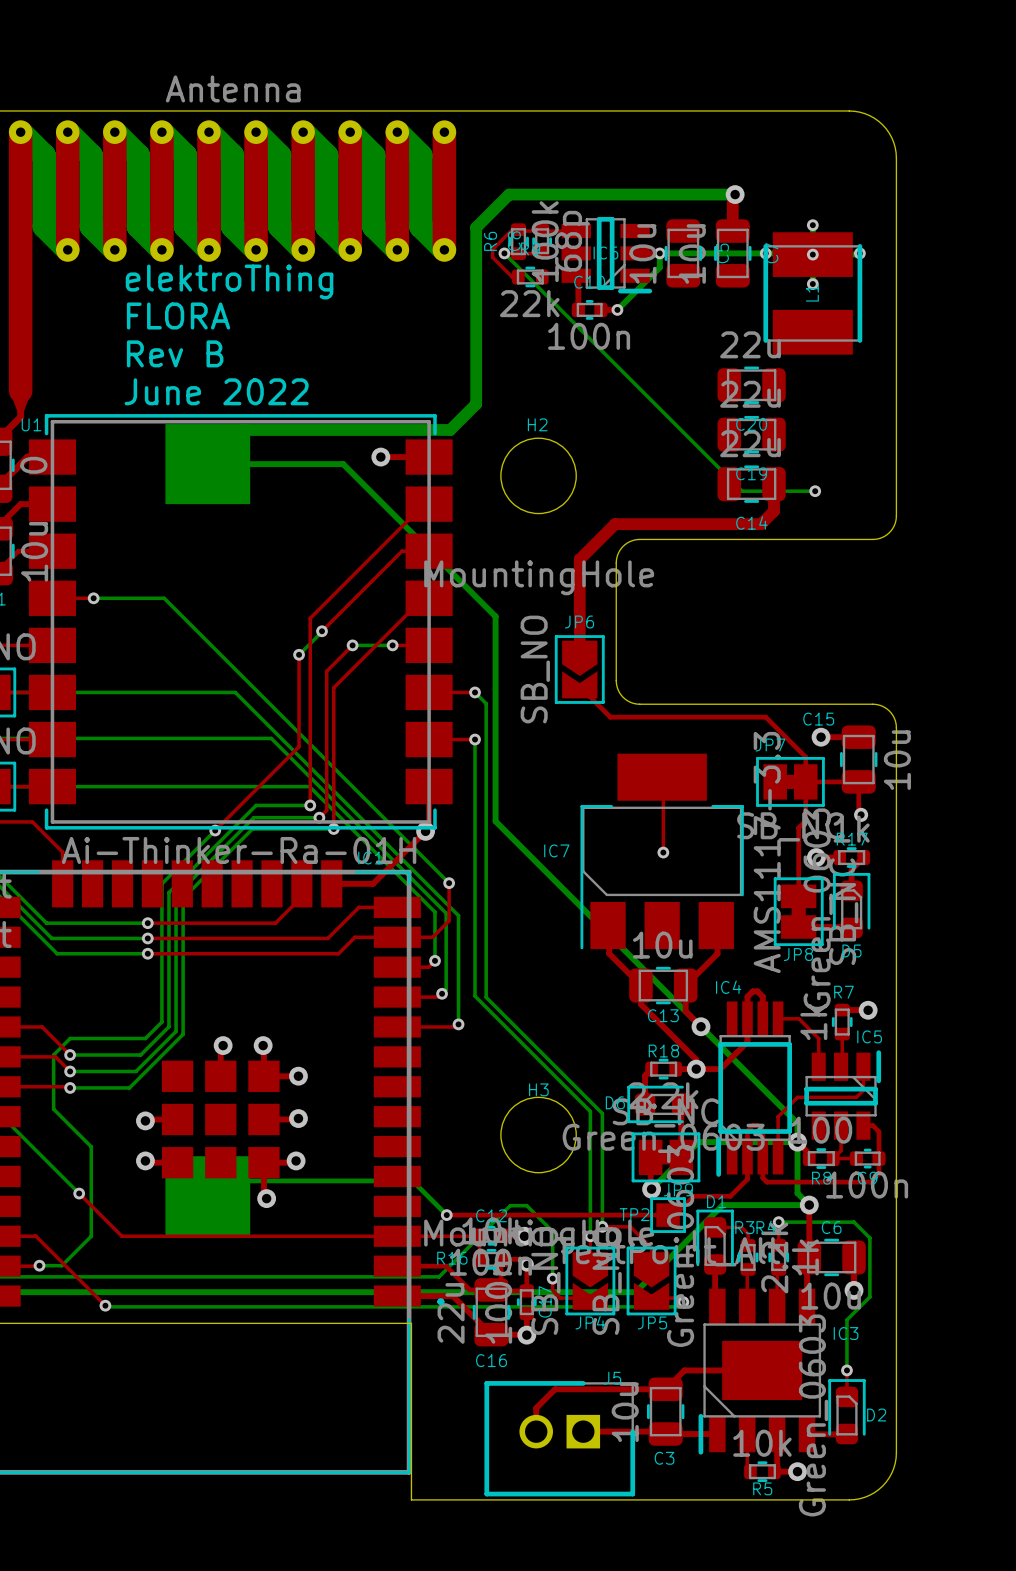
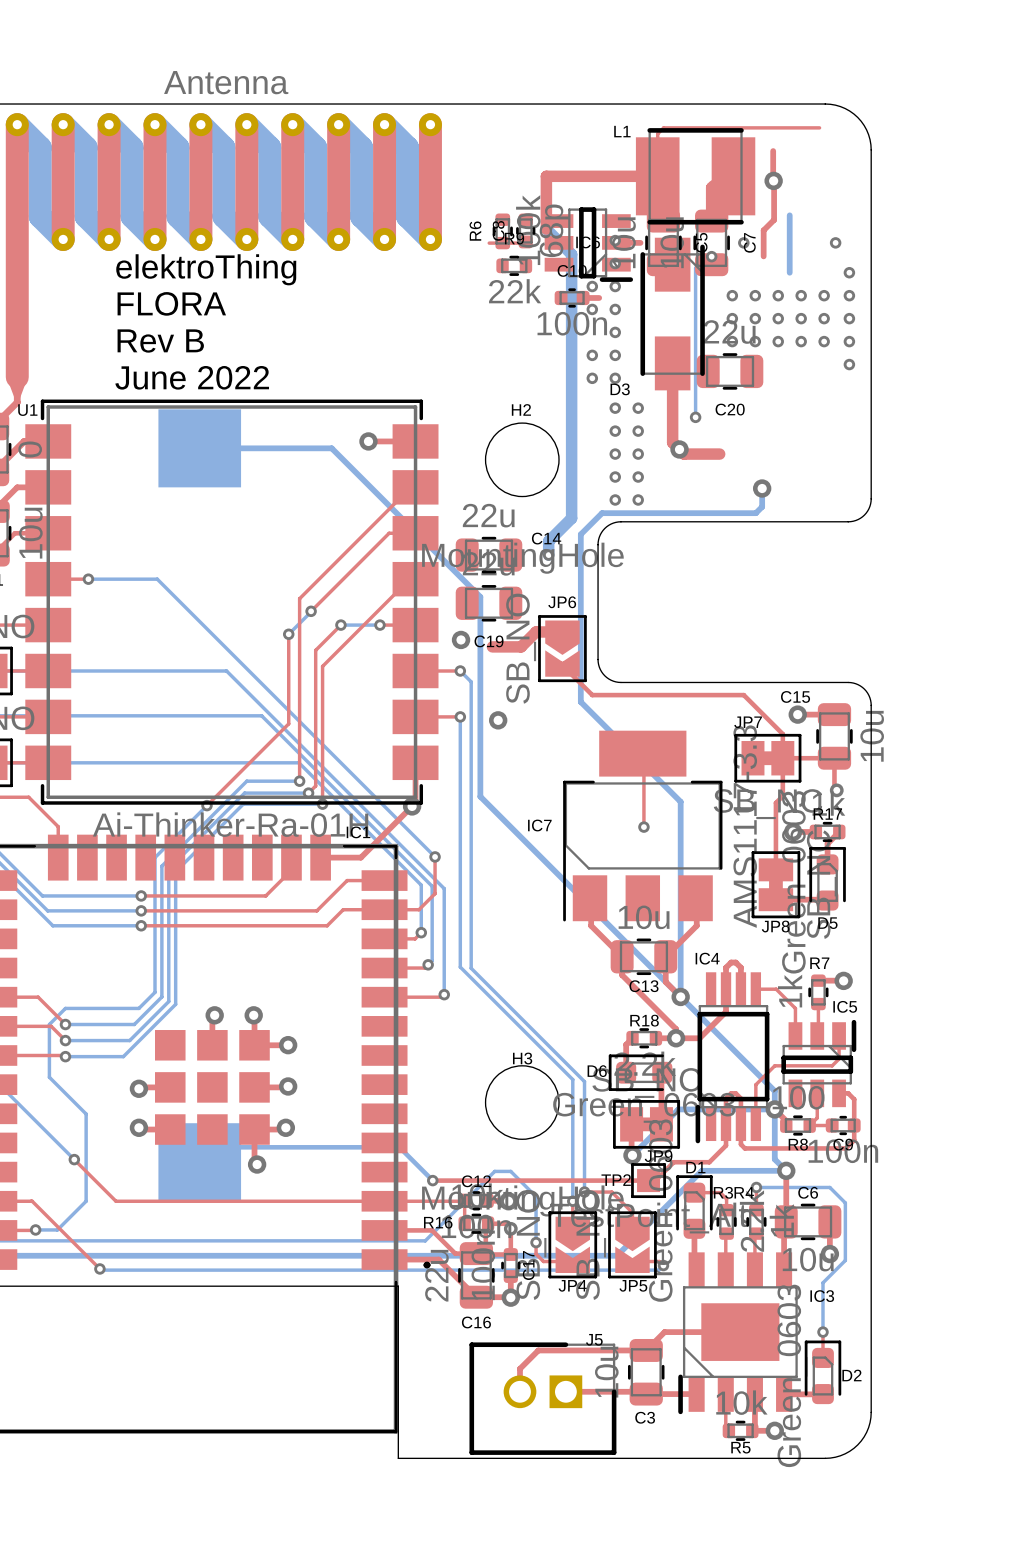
top track: none -> (819, 127) (663, 127) (657, 133) (657, 176) (546, 176) (546, 229)
top track: none -> (773, 151) (774, 219) (763, 230) (763, 256)
bottom track: (735, 194) (509, 194) (476, 227) (476, 404) (450, 429) (241, 429) (207, 464) -> none
via position: (735, 194) -> (773, 180)
via: (812, 225) -> none
top track: (576, 231) (512, 229) (492, 249) (492, 257) (512, 276) (518, 276) -> none
bottom track: none -> (546, 229) (571, 254) (571, 518) (548, 541) (548, 555)
via: none -> (615, 240)
bottom track: (504, 253) (742, 491) (815, 491) -> none
via: (504, 253) -> none
via: (659, 253) -> none
bottom track: (859, 253) (659, 253) (659, 267) (617, 309) -> none
via: (812, 254) -> none
bottom track: none -> (711, 256) (707, 256) (695, 268) (695, 417)
via: none -> (711, 256)
via: none -> (615, 263)
top track: (576, 275) (578, 277) (578, 309) -> none
via: (812, 284) -> none
via: none -> (849, 272)
L1 rotation: 0° (812, 293) -> 90° clockwise (695, 176)
L1 position: (812, 293) -> (695, 176)
L1 name position: L1 (812, 293) -> L1 (622, 131)
via: none -> (592, 286)
via: none -> (615, 286)
via: none -> (732, 295)
via: none -> (755, 295)
via: none -> (778, 295)
via: none -> (801, 295)
via: none -> (824, 295)
via: none -> (849, 295)
via: (617, 309) -> none
via: none -> (592, 309)
via: none -> (615, 309)
D3: none -> (672, 314)
via: none -> (732, 318)
via: none -> (755, 318)
via: none -> (778, 318)
via: none -> (801, 318)
via: none -> (824, 318)
via: none -> (849, 318)
via: none -> (615, 332)
via: none -> (732, 341)
via: none -> (755, 341)
via: none -> (778, 341)
via: none -> (801, 341)
via: none -> (824, 341)
via: none -> (849, 341)
via: none -> (592, 355)
via: none -> (615, 355)
top track: none -> (672, 363) (672, 442) (684, 454) (719, 454)
via: none -> (849, 364)
via: none -> (592, 378)
via: none -> (615, 378)
via: none -> (615, 408)
via: none -> (638, 408)
via: none -> (695, 417)
C19 position: (751, 434) -> (489, 603)
via: none -> (615, 431)
via: none -> (638, 431)
via: none -> (679, 449)
via: none -> (615, 454)
via: none -> (638, 454)
C14 position: (751, 484) -> (489, 555)
top track: (773, 484) (773, 511) (761, 524) (615, 524) (579, 559) (579, 652) -> (492, 646) (521, 646) (536, 631) (562, 631)
via: (815, 491) -> none
via: none -> (615, 477)
via: none -> (638, 477)
bottom track: none -> (762, 488) (762, 506) (755, 513) (602, 513) (580, 534) (580, 701) (680, 801) (680, 996)
via: none -> (762, 488)
via: none -> (615, 499)
via: none -> (638, 499)
C14 name position: C14 (751, 522) -> C14 (546, 538)
via: none -> (548, 555)
via: none -> (461, 639)
via: none -> (498, 720)

